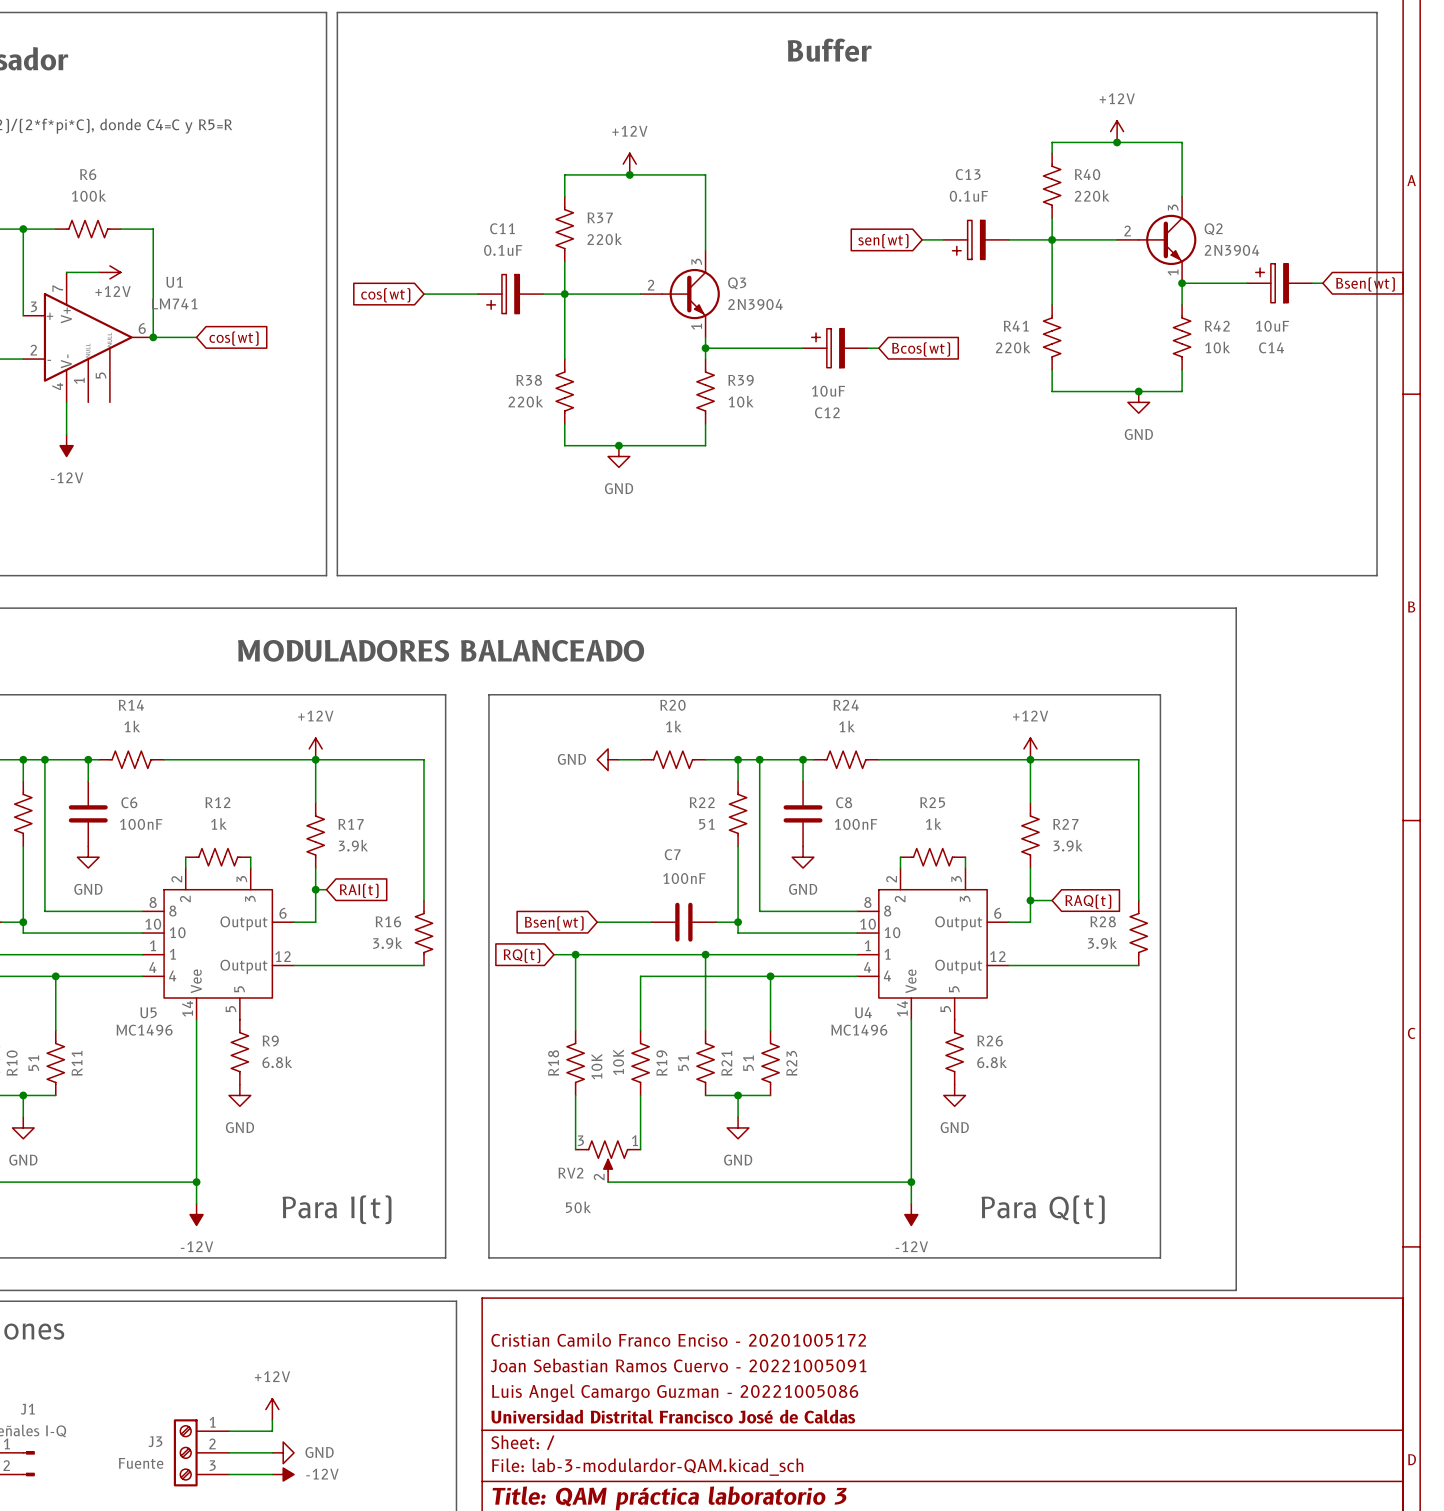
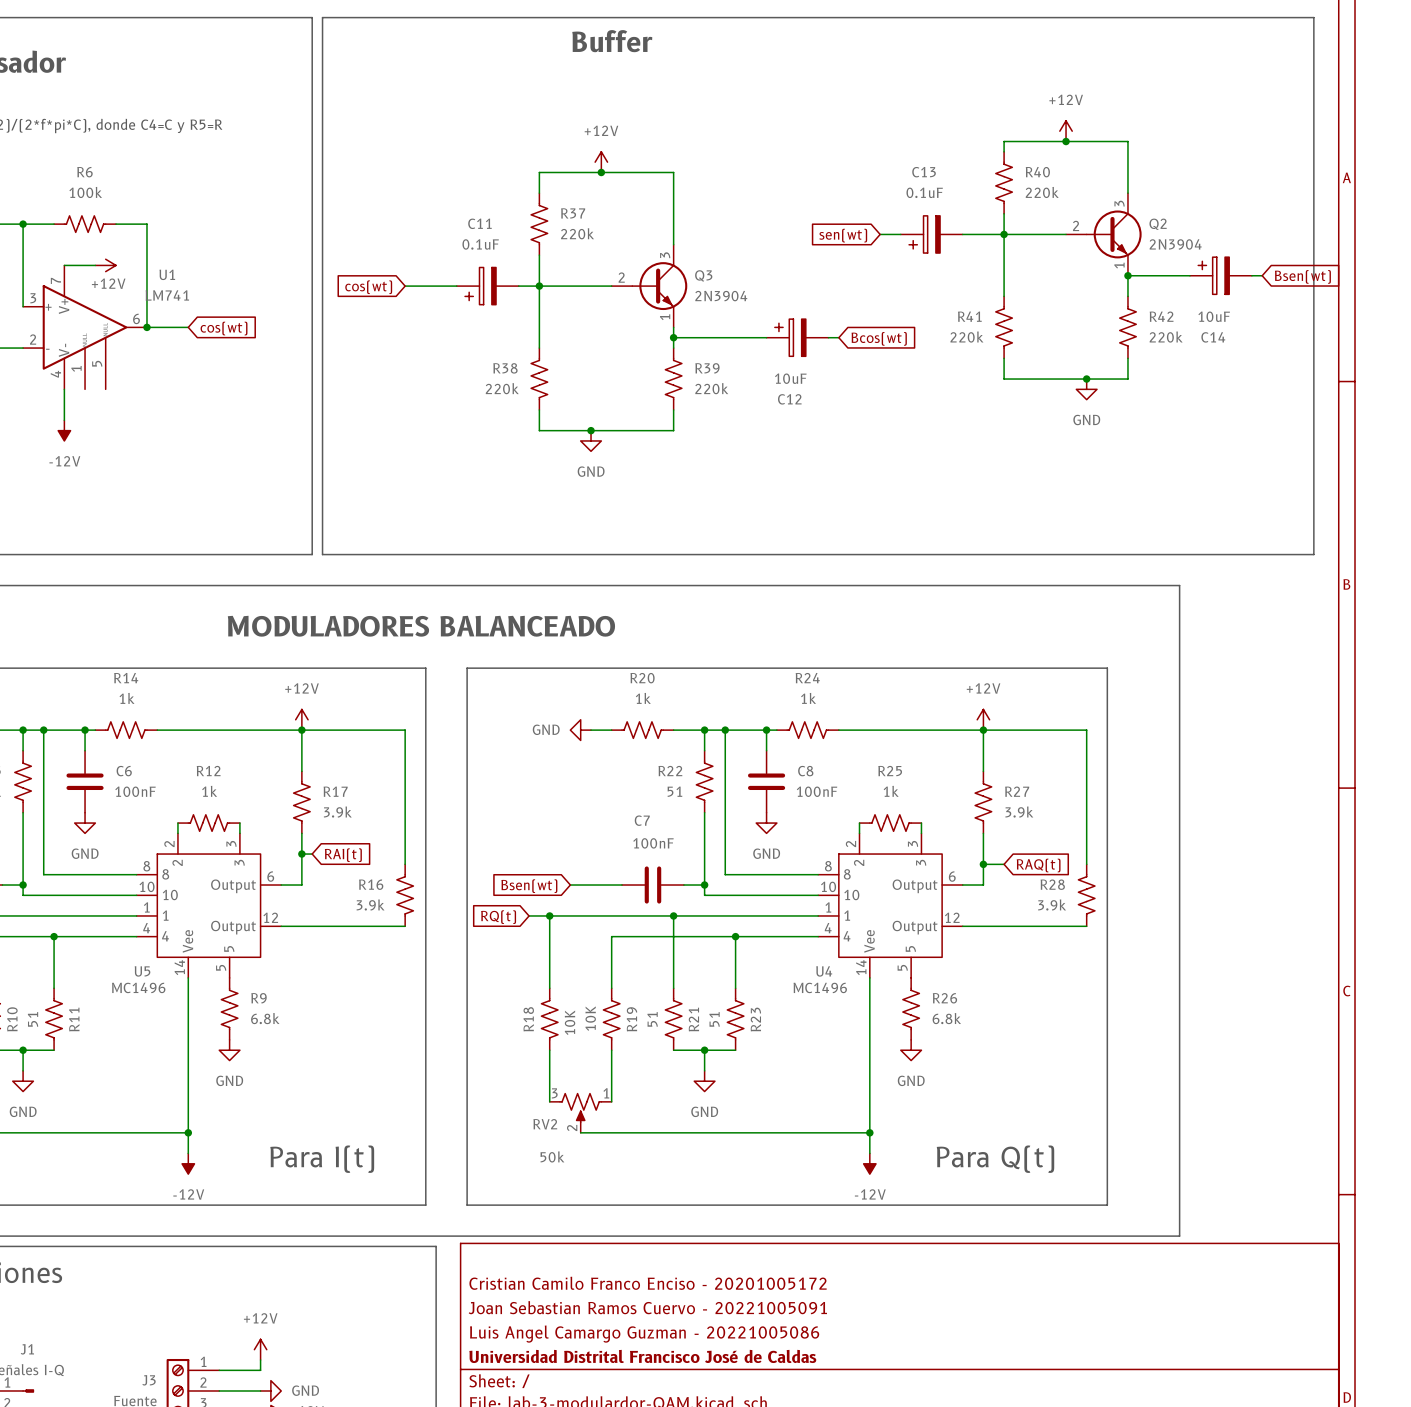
text position: Buffer (829, 50) -> Buffer (612, 41)
R42 value: 10k (1217, 347) -> 220k (1166, 337)
R39 value: 10k (741, 401) -> 220k (711, 388)

